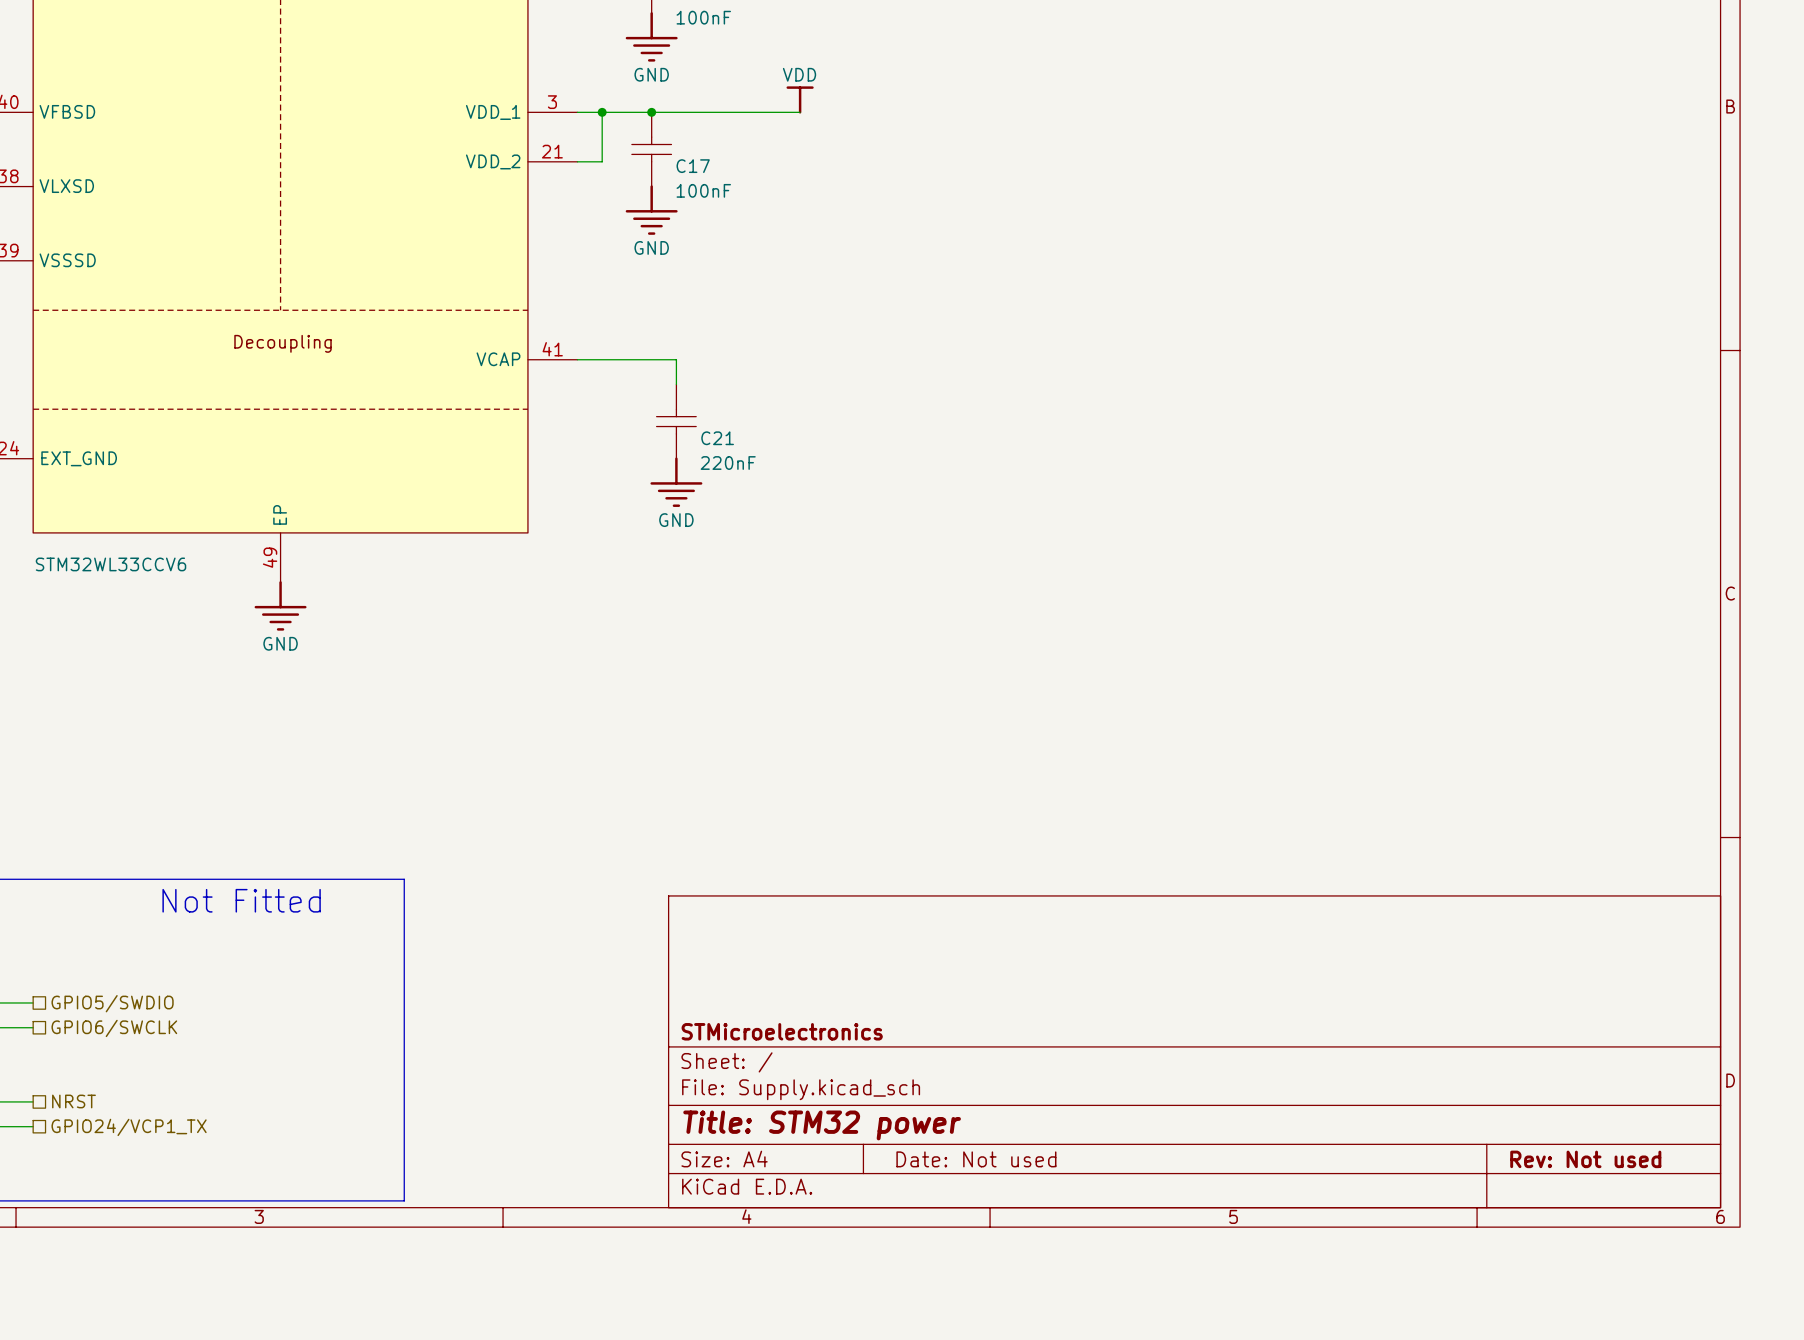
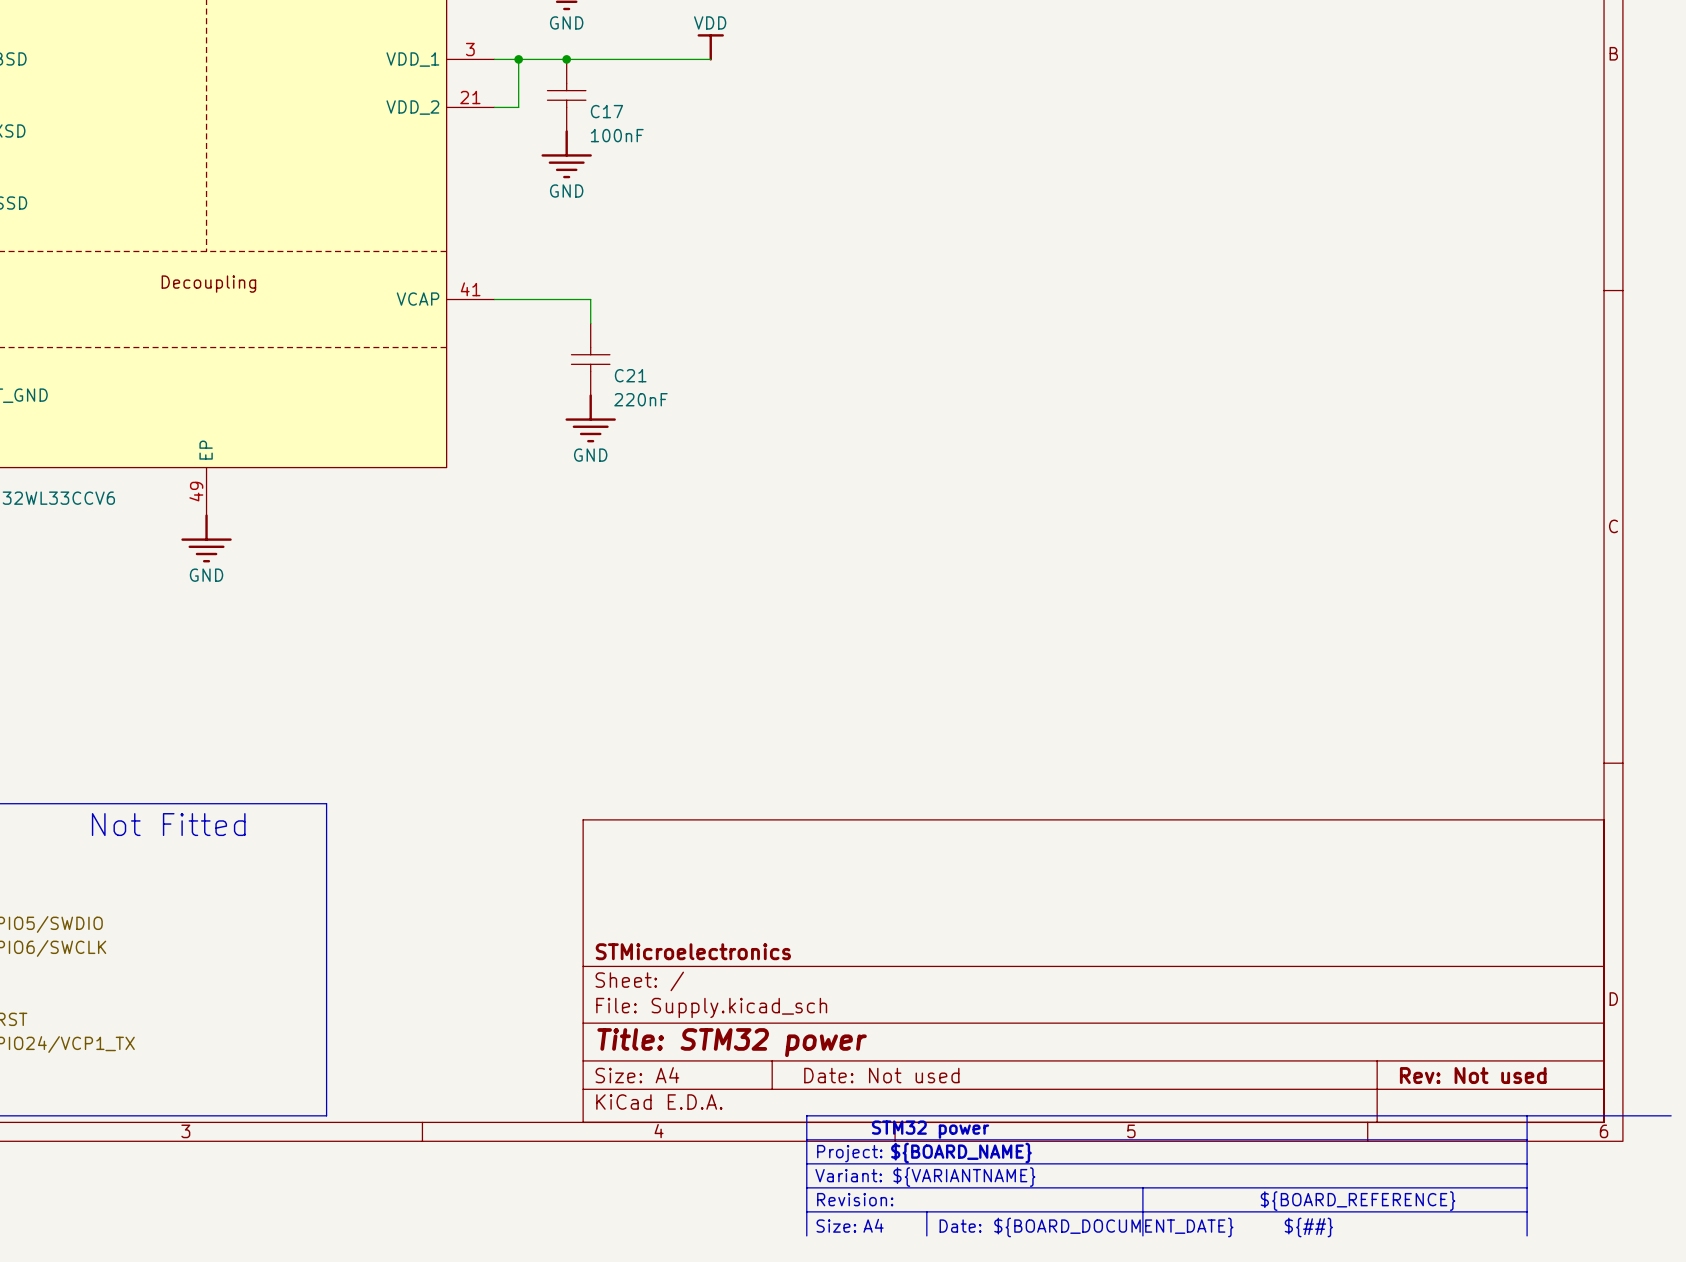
line: none -> (1527, 1115) (1527, 1235)
line: none -> (1671, 1115) (806, 1115) (806, 1235)
text: none -> STM32 power (930, 1129)
line: none -> (806, 1139) (1527, 1139)
text: none -> Project: (849, 1153)
text: none -> ${BOARD_NAME} (961, 1153)
line: none -> (806, 1163) (1527, 1163)
text: none -> Variant: (848, 1175)
text: none -> ${VARIANTNAME} (964, 1177)
line: none -> (806, 1187) (1527, 1187)
line: none -> (1142, 1187) (1142, 1235)
text: none -> Revision: (855, 1199)
text: none -> ${BOARD_REFERENCE} (1358, 1201)
line: none -> (806, 1211) (1527, 1211)
line: none -> (926, 1211) (926, 1235)
text: none -> Size: (836, 1226)
text: none -> A4 (873, 1225)
text: none -> Date: (960, 1226)
text: none -> ${BOARD_DOCUMENT_DATE} (1113, 1227)
text: none -> ${##} (1308, 1227)

